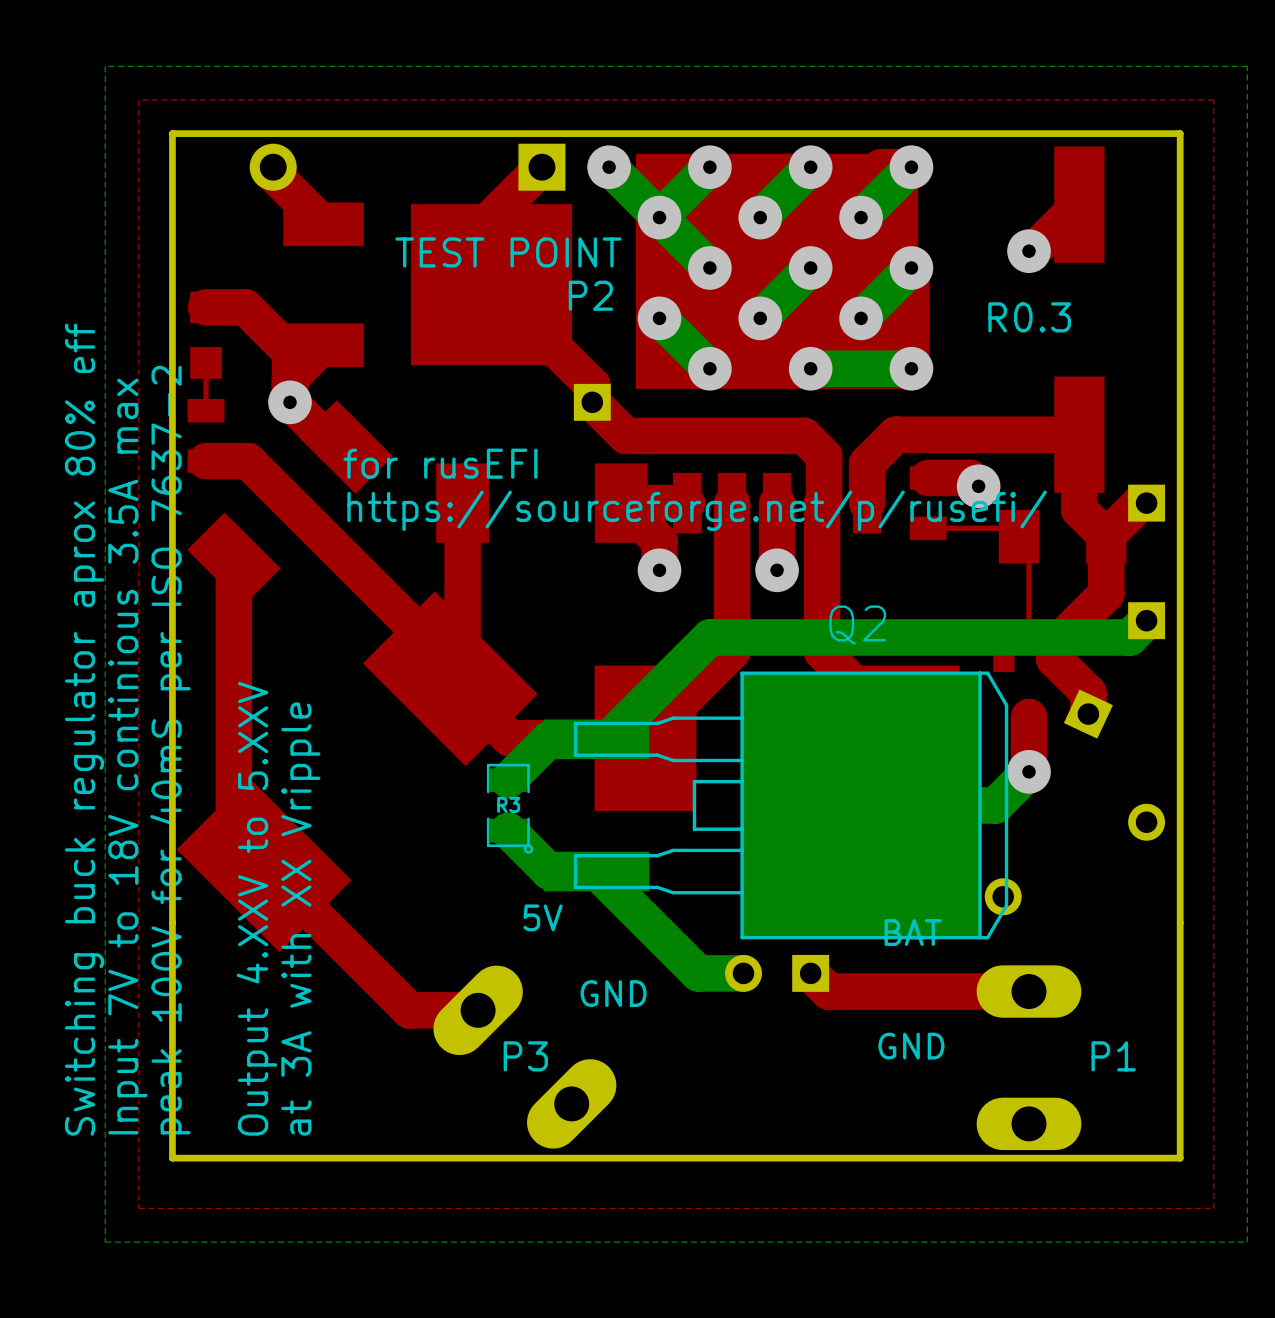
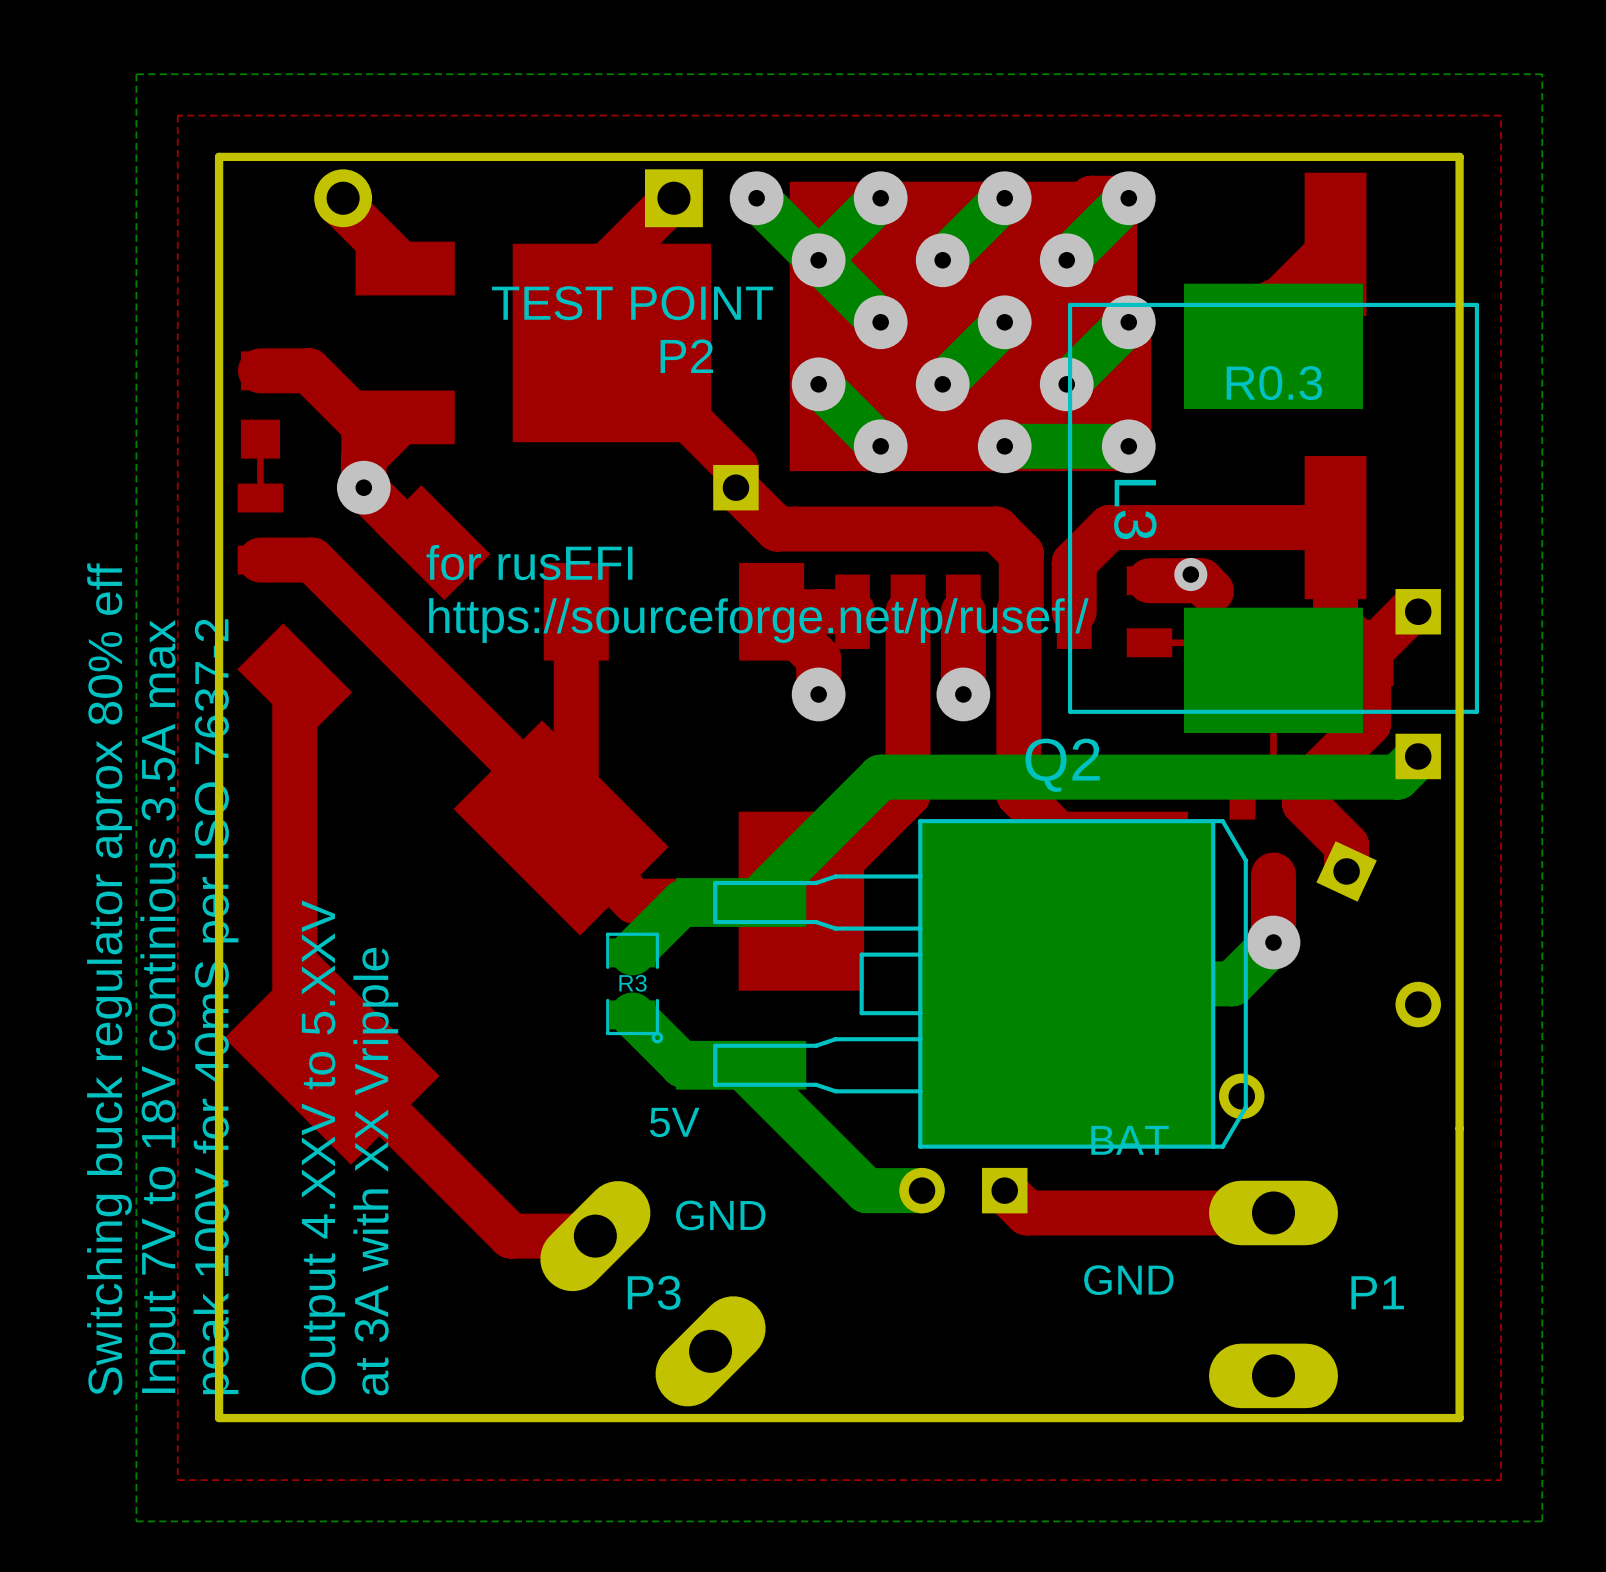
via: (1029, 251) -> none
L3: none -> (1273, 508)
via size: [956, 464, 1001, 509] -> [1174, 557, 1208, 592]

